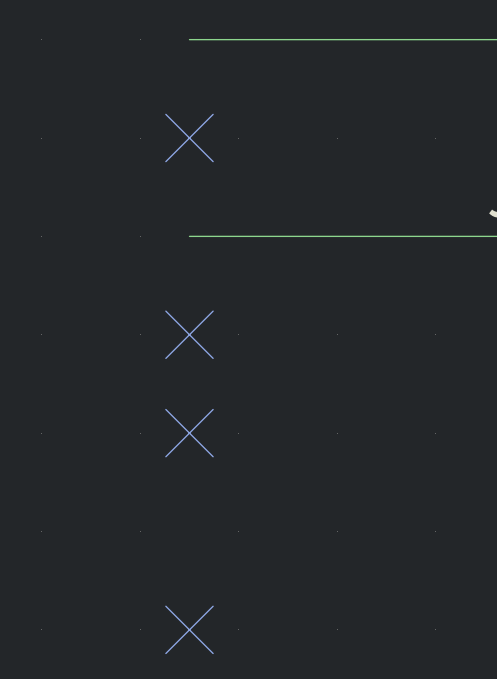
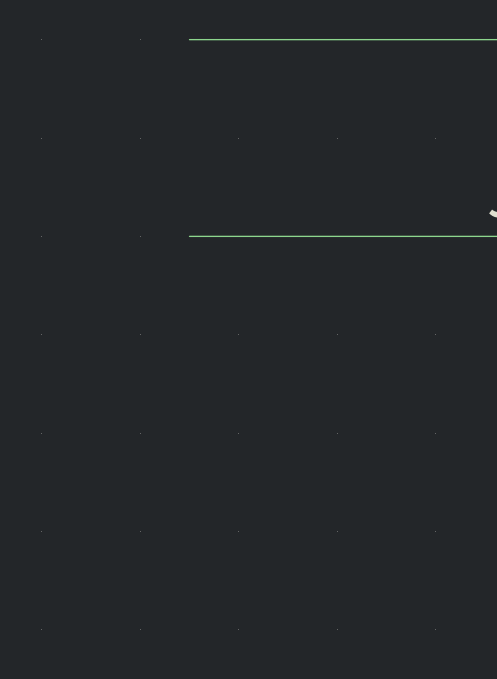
no-connect mark: (189, 138) -> none
no-connect mark: (189, 334) -> none
no-connect mark: (189, 433) -> none
no-connect mark: (189, 629) -> none

